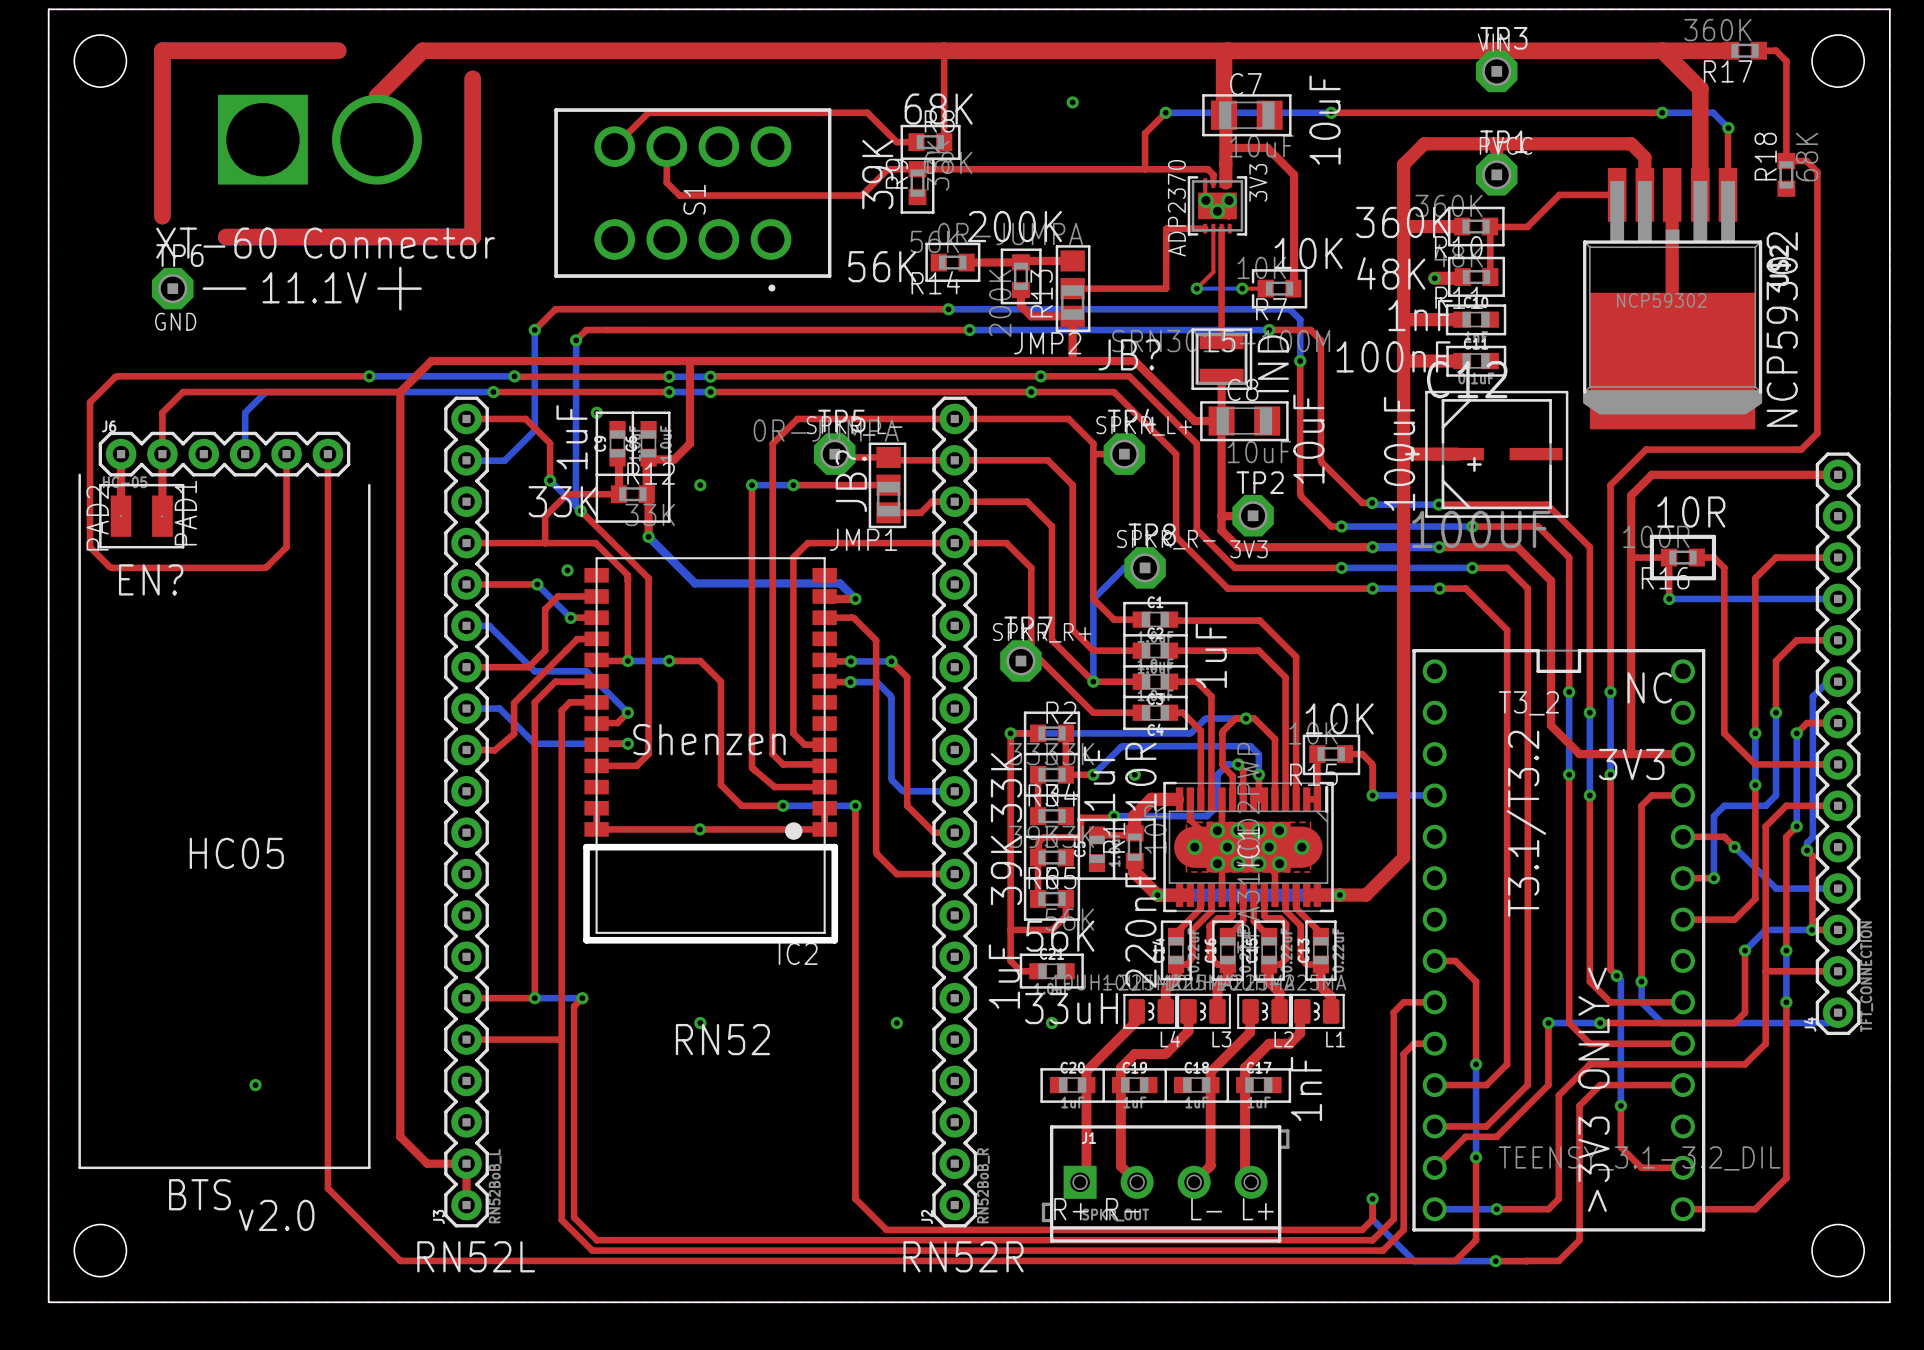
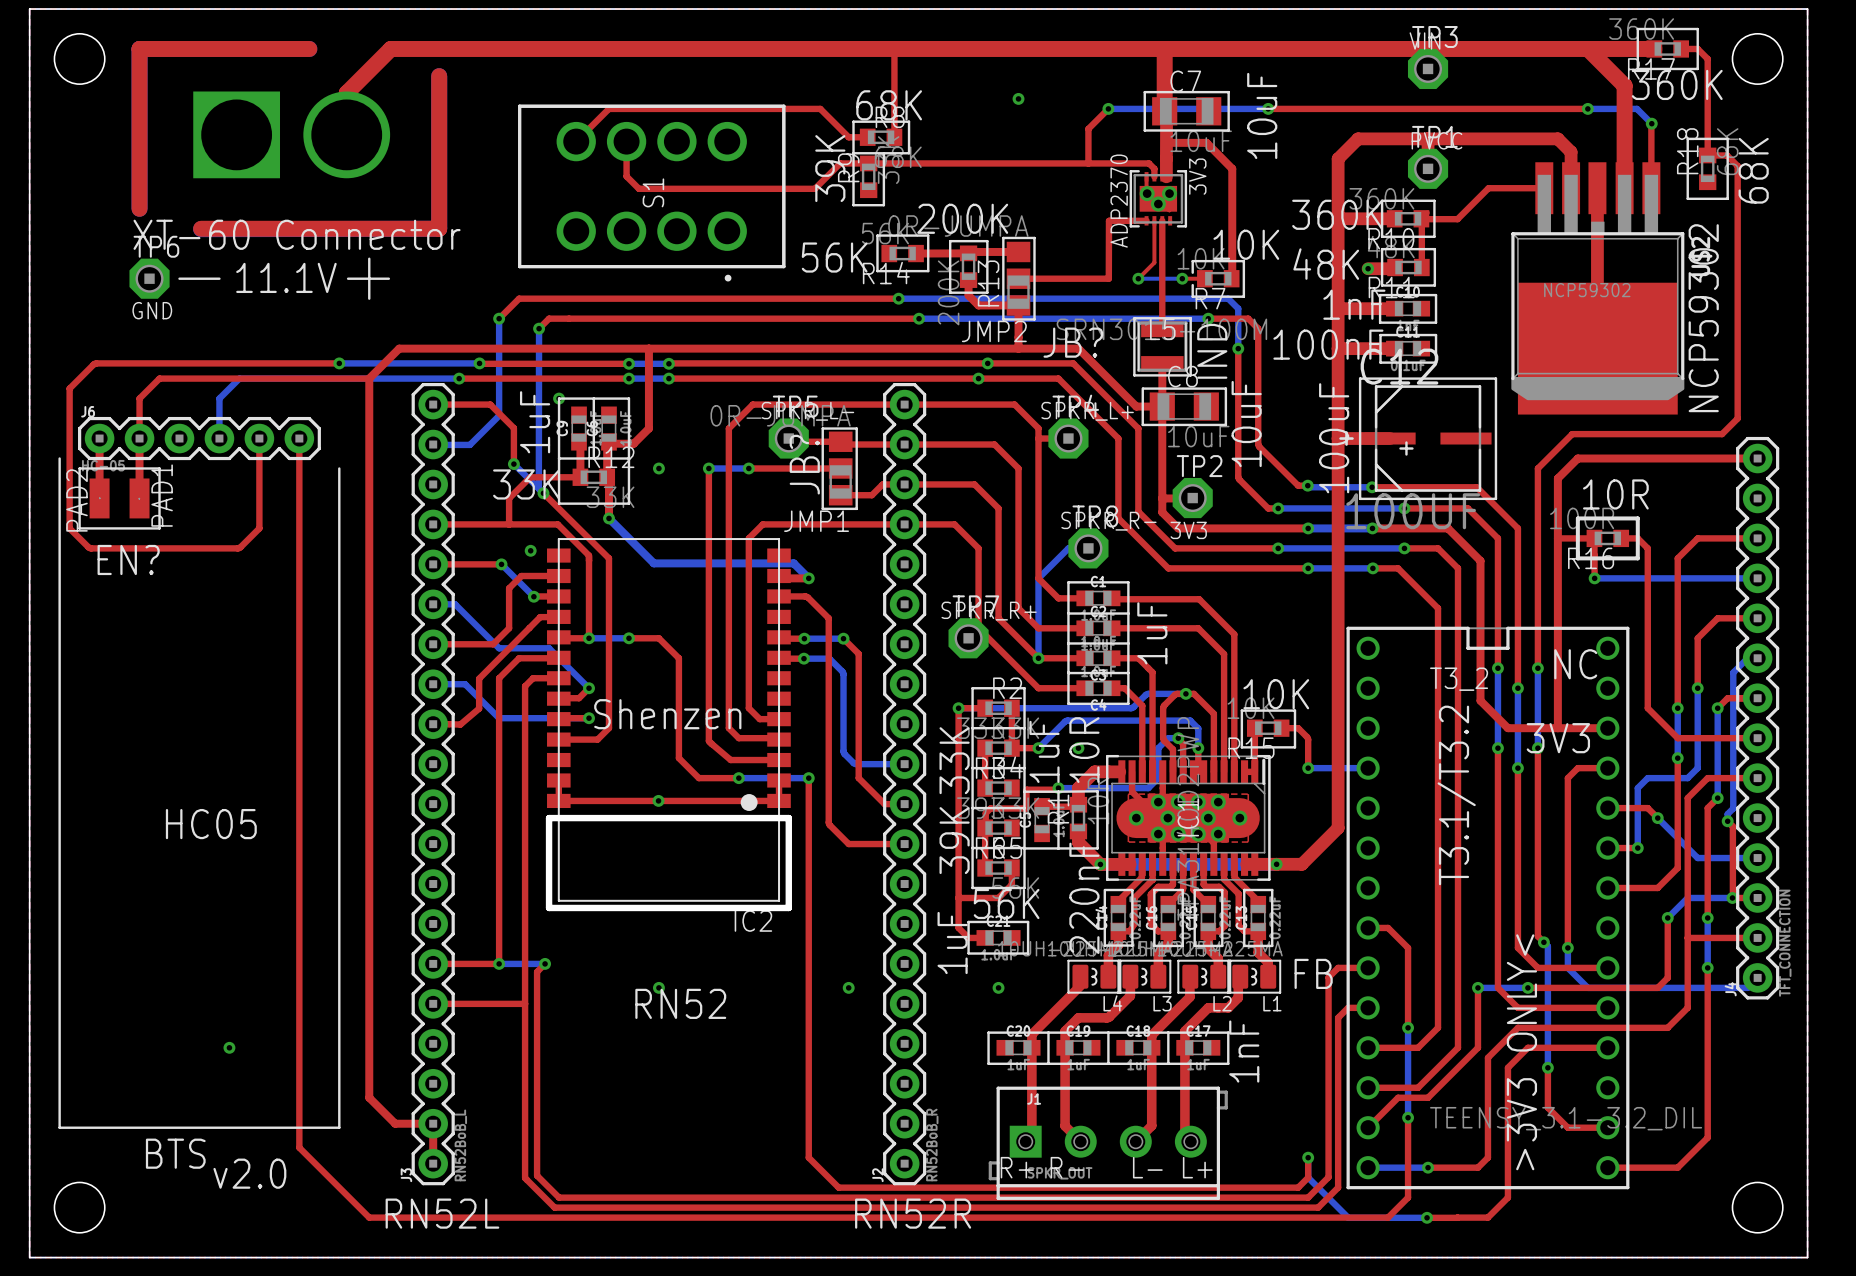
line: none -> (1637, 29) (1697, 29) (1697, 68) (1637, 68) (1637, 29)
text: none -> 360K (1677, 84)
line: none -> (1687, 138) (1727, 138) (1727, 198) (1687, 198) (1687, 138)
text: none -> 68K (1753, 170)
text: 33uH (1071, 1008) -> none
text: none -> FB (1313, 973)

